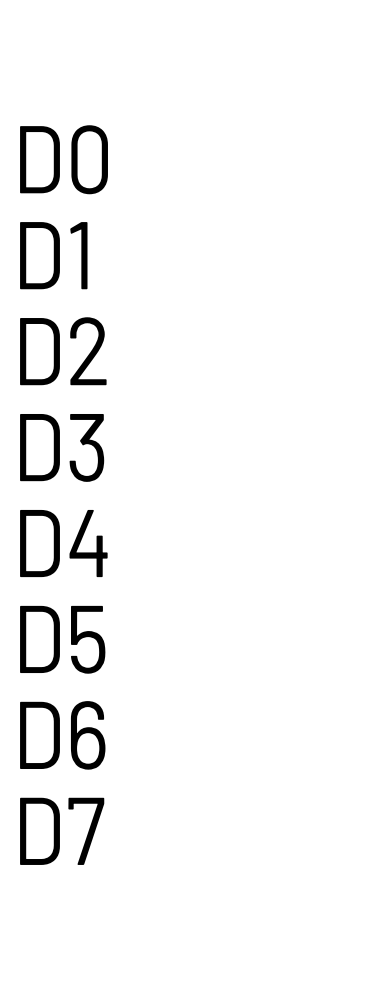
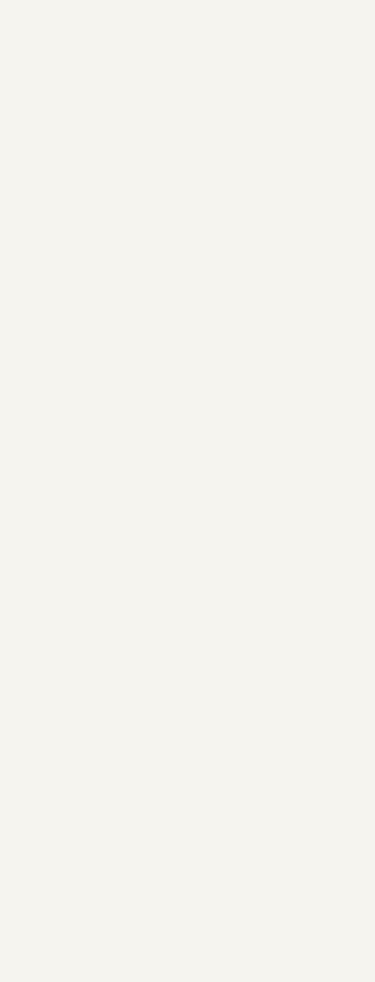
text: D0 (64, 159) -> none
text: D1 (53, 255) -> none
text: D2 (63, 351) -> none
text: D3 (62, 447) -> none
text: D4 (63, 543) -> none
text: D5 (62, 639) -> none
text: D6 (62, 735) -> none
text: D7 (62, 831) -> none

